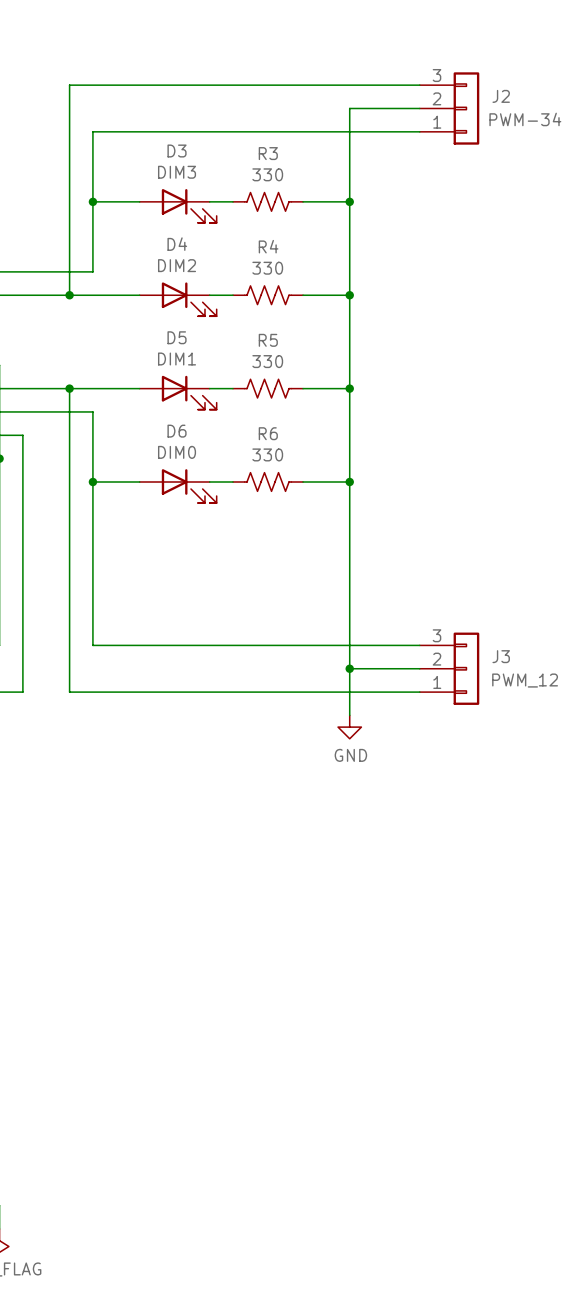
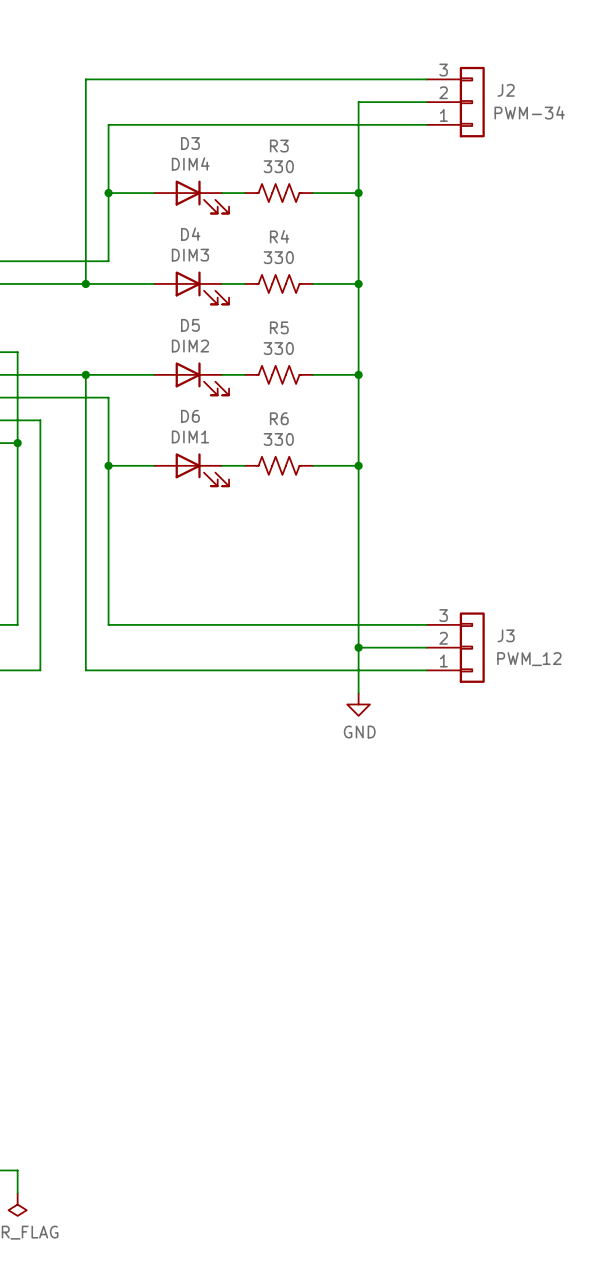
D3 value: DIM3 (177, 172) -> DIM4 (190, 163)
D4 value: DIM2 (177, 265) -> DIM3 (190, 255)
D5 value: DIM1 (177, 359) -> DIM2 (190, 346)
D6 value: DIM0 (177, 452) -> DIM1 (190, 436)

